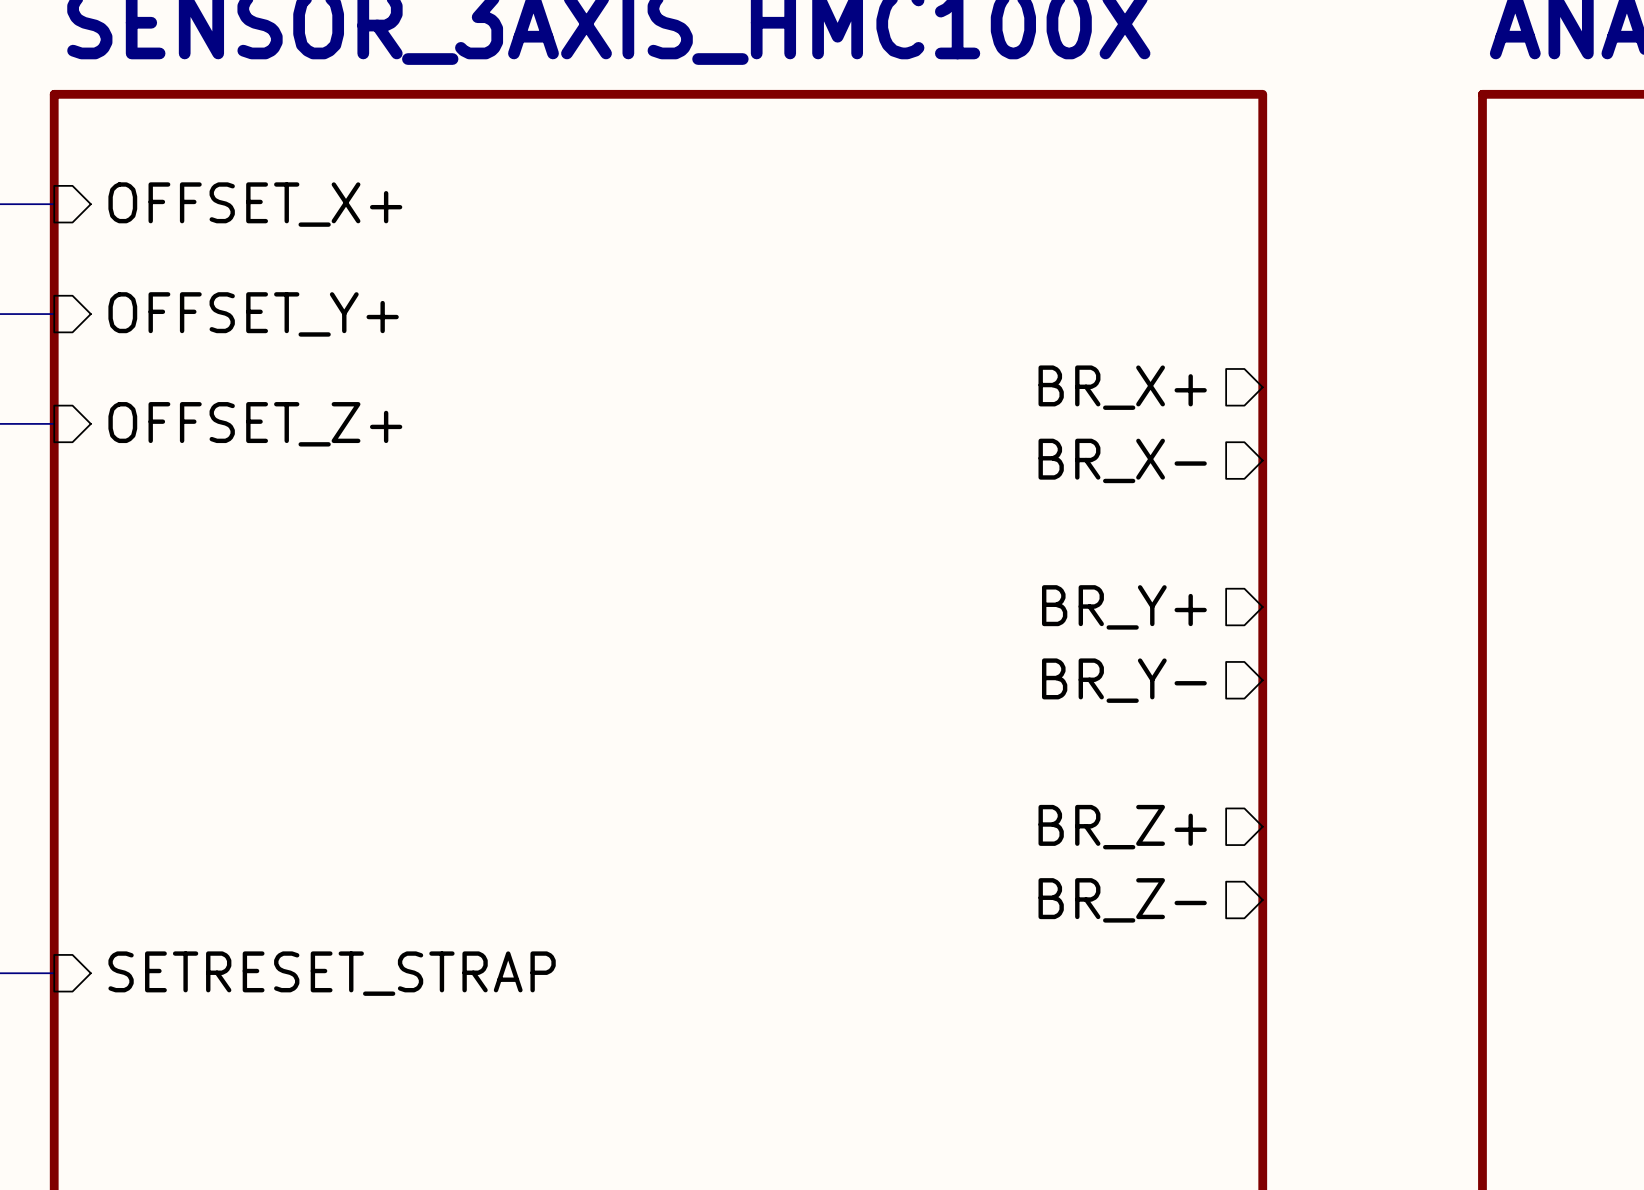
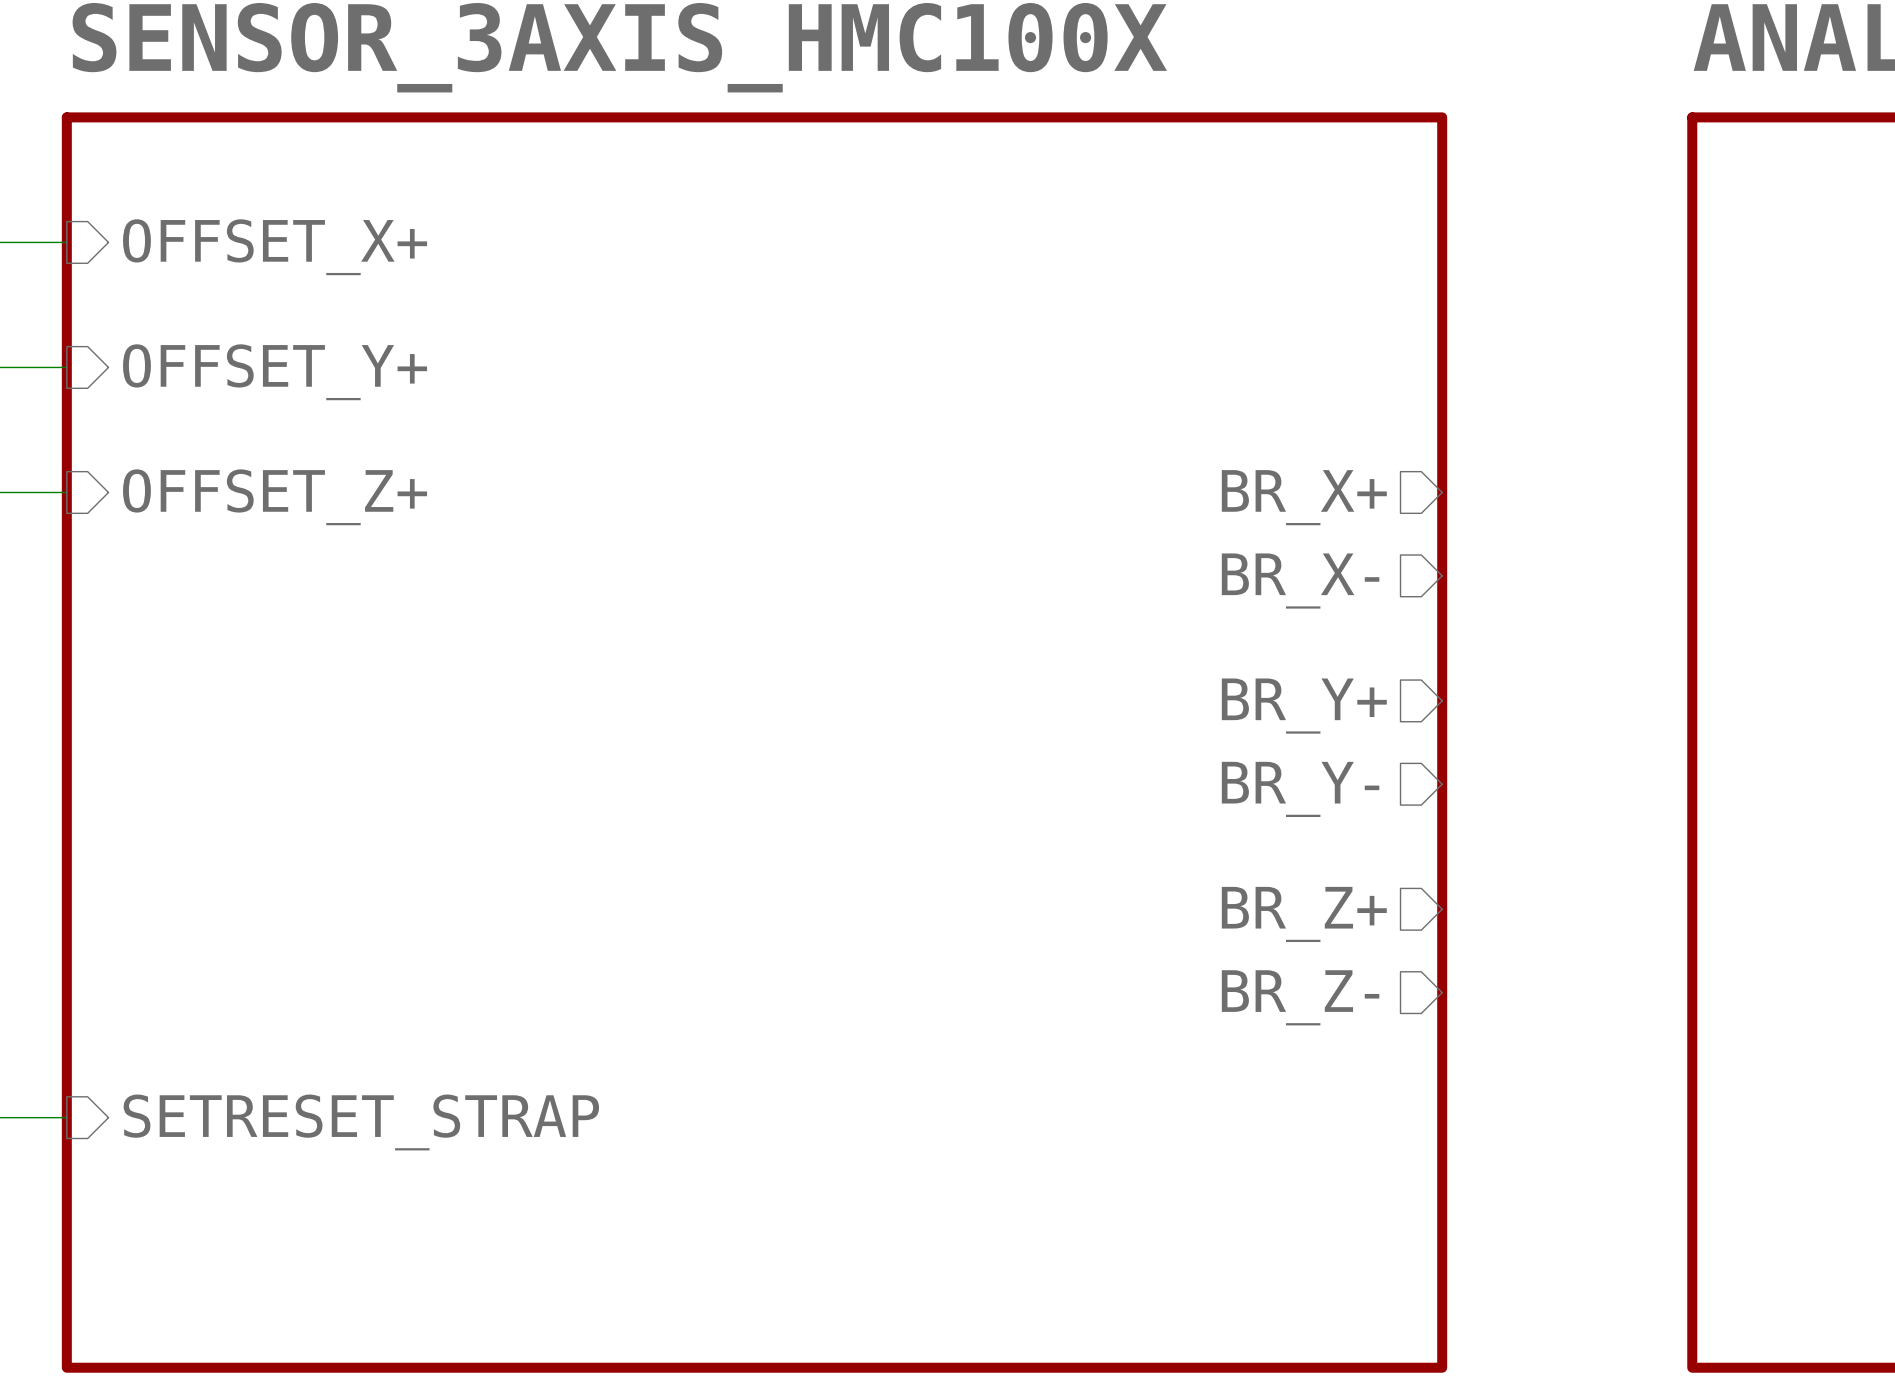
sheet pin position: BR_X+ (1122, 387) -> BR_X+ (1304, 497)
sheet pin position: BR_X- (1122, 460) -> BR_X- (1300, 581)
sheet pin position: BR_Z+ (1122, 827) -> BR_Z+ (1304, 914)
sheet pin position: BR_Z- (1122, 900) -> BR_Z- (1300, 997)

